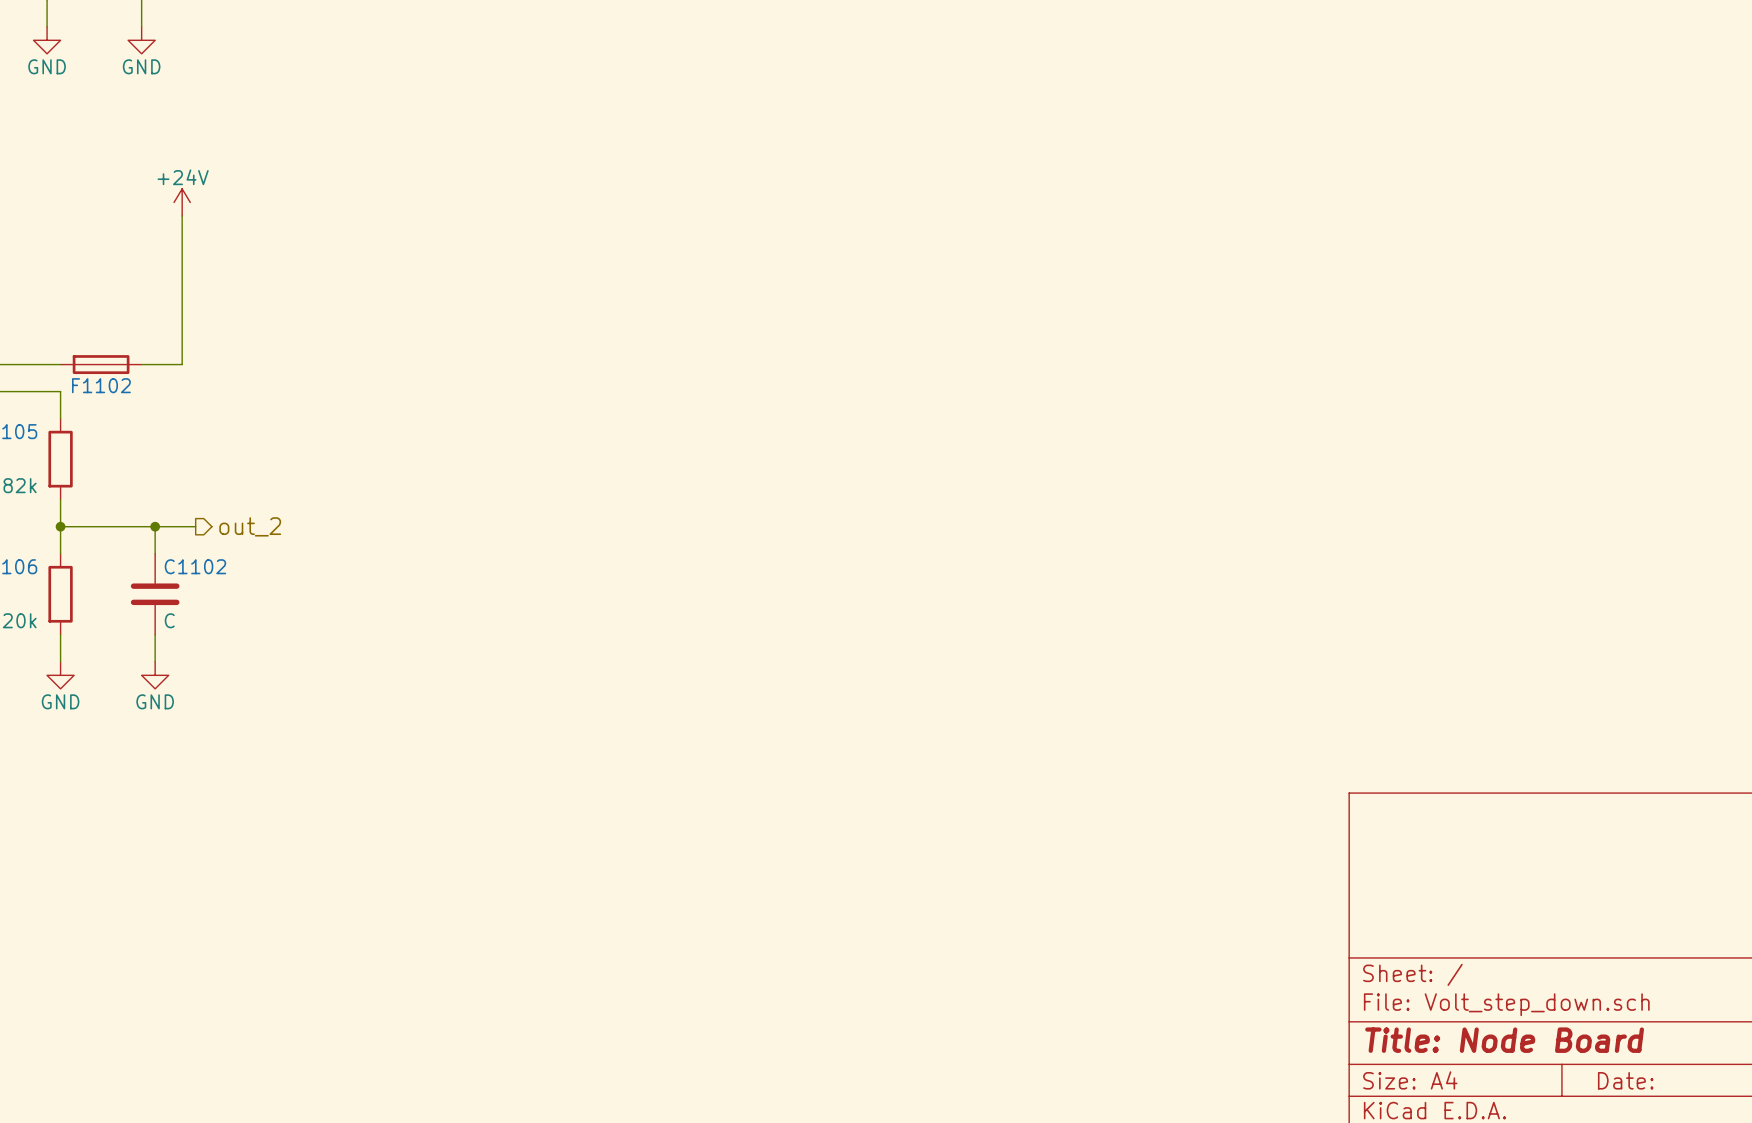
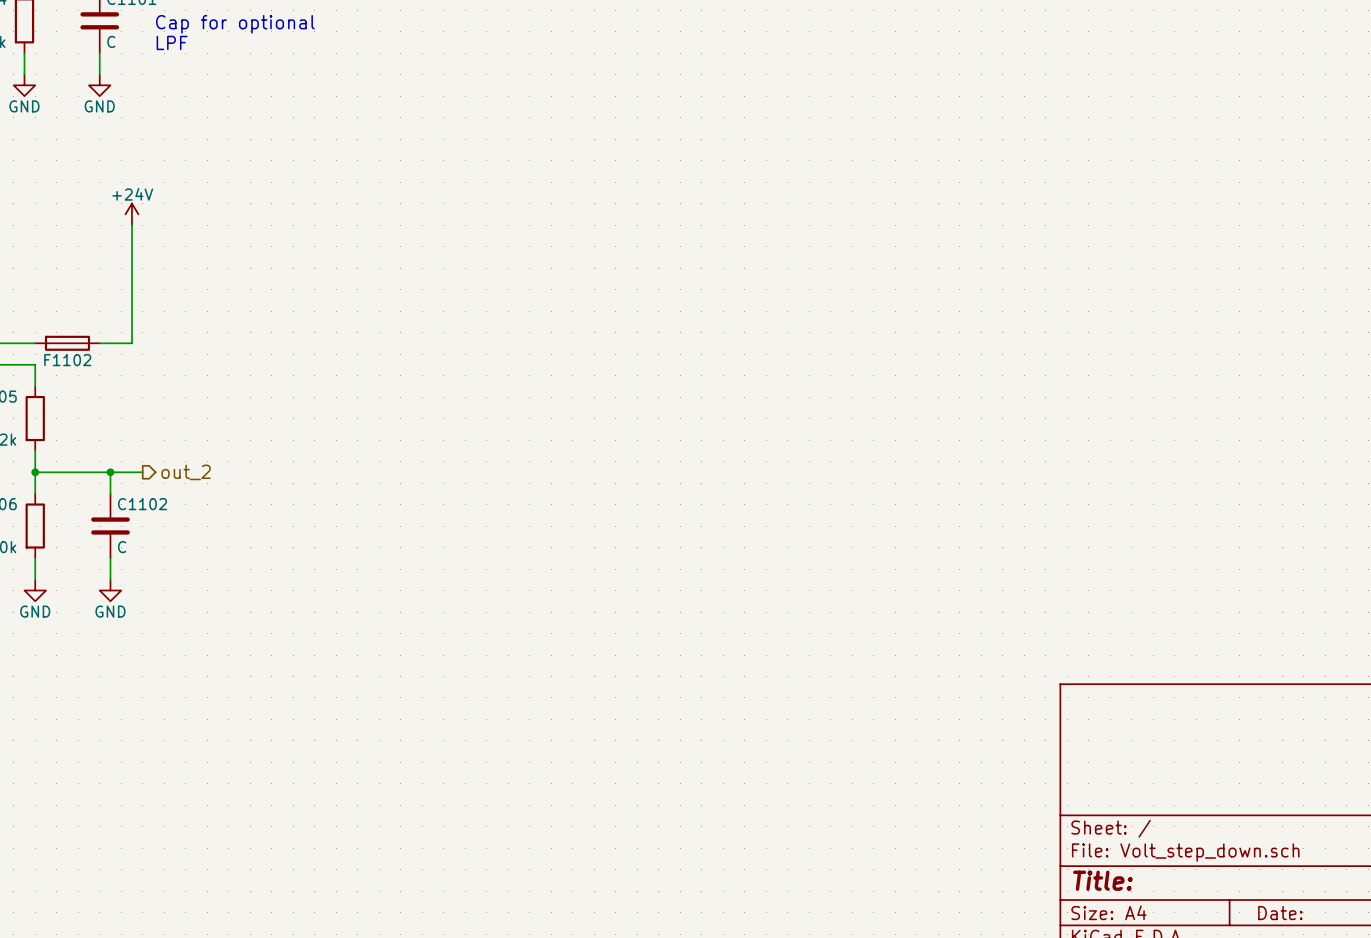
title block: Title: Node Board (1504, 1040) -> Title: (1102, 880)

